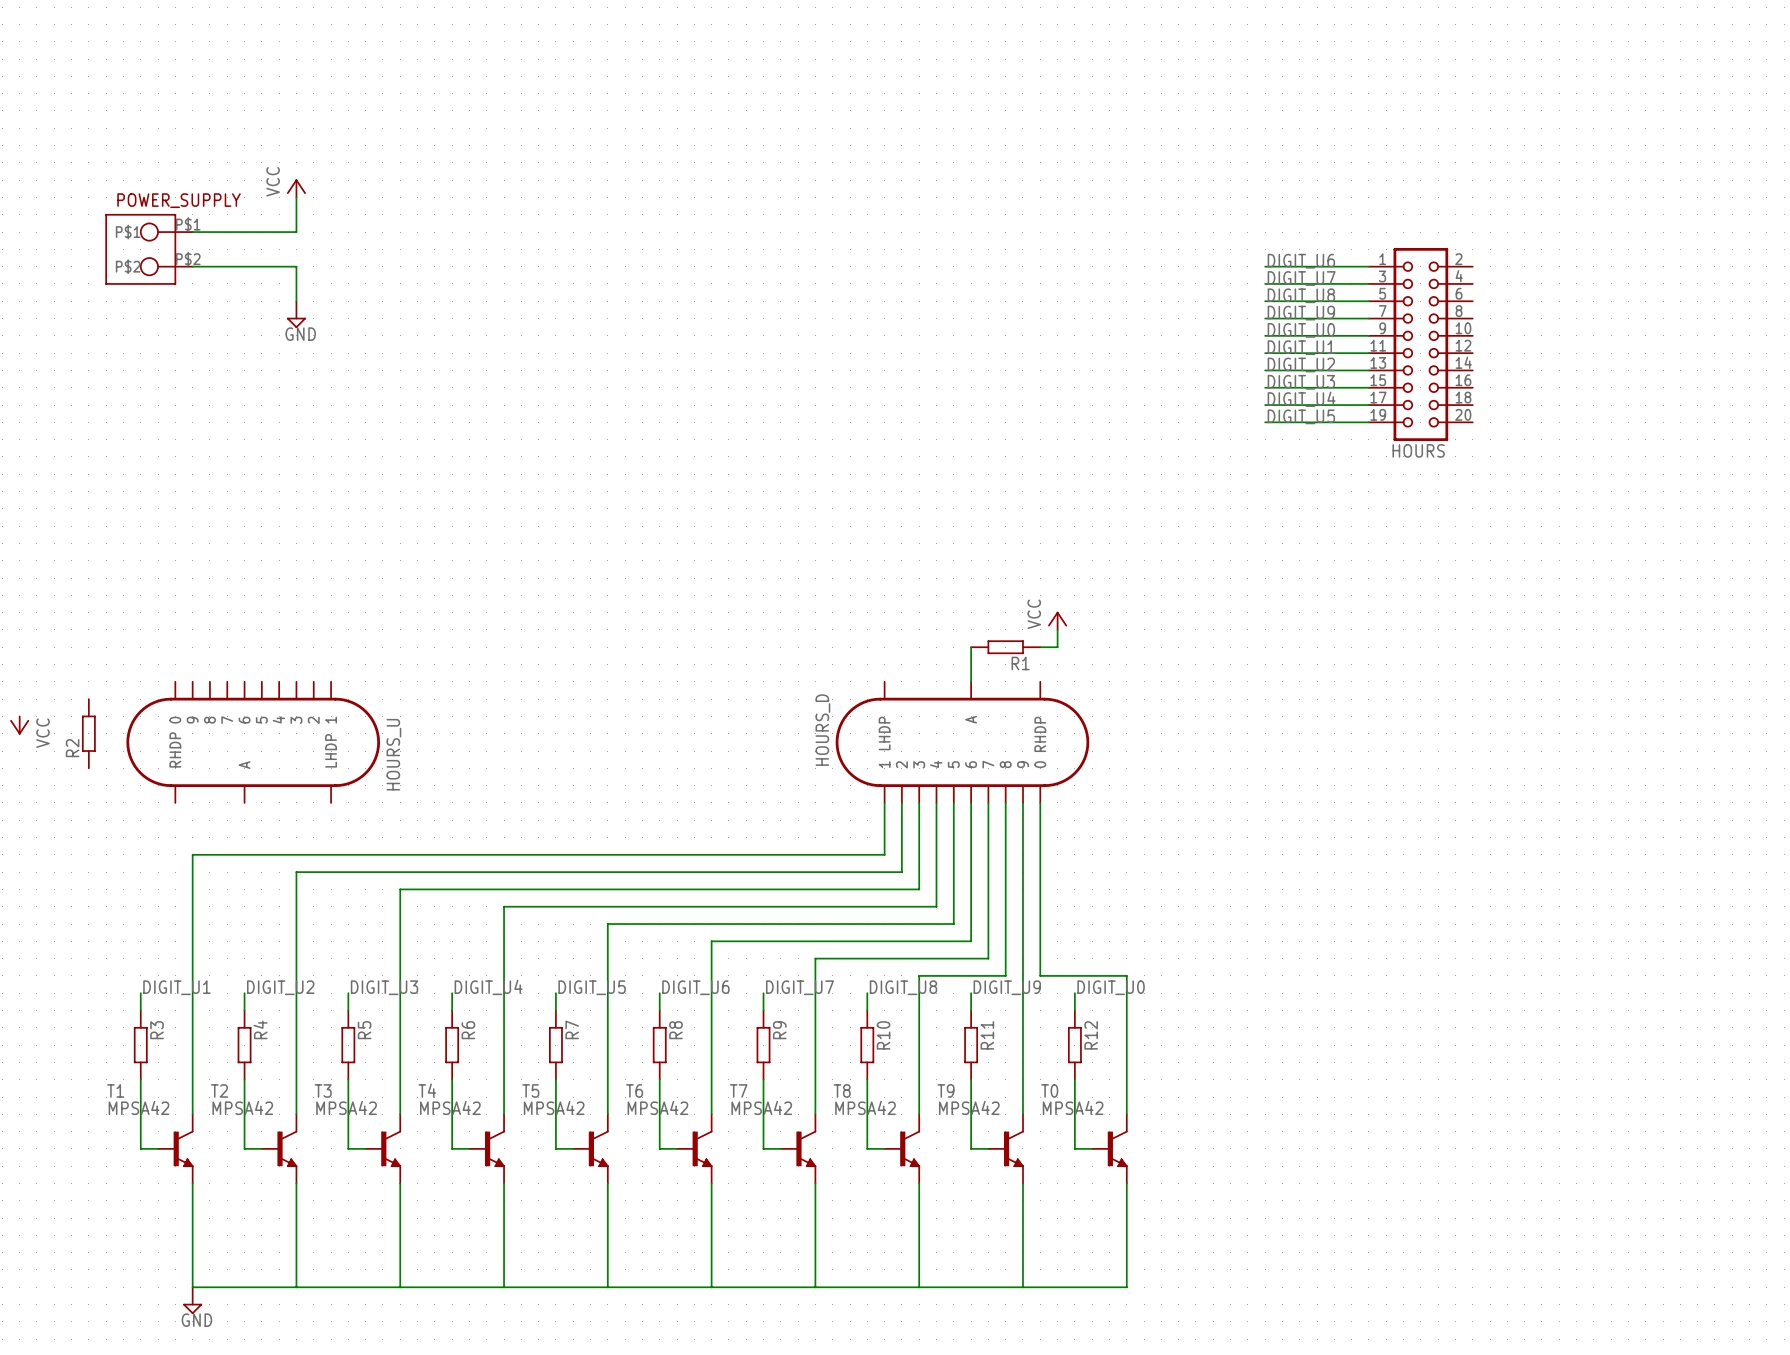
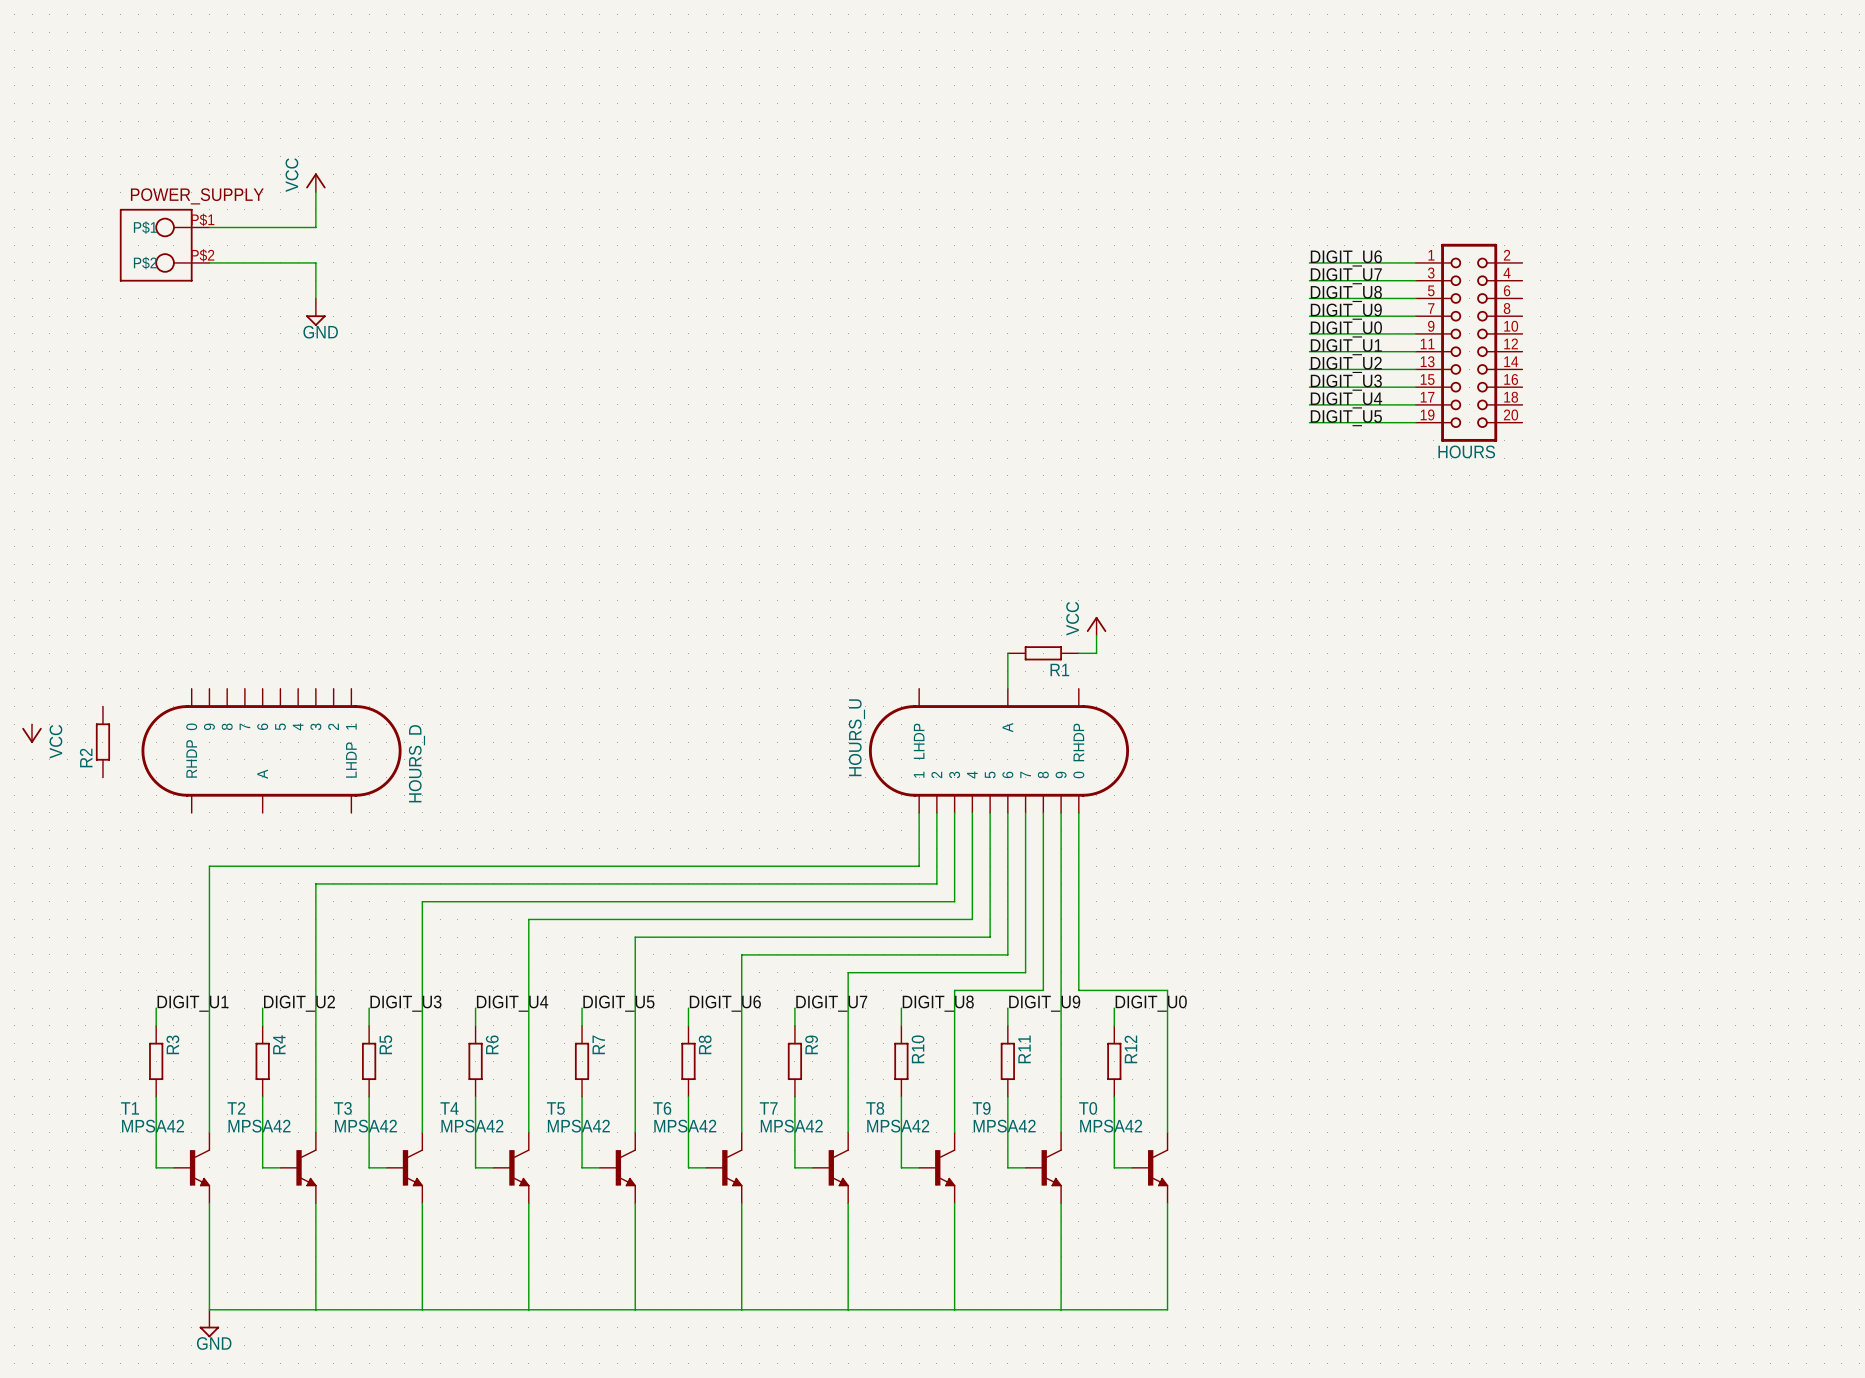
HOURS_D name: HOURS_D (822, 730) -> HOURS_U (856, 737)
HOURS_U name: HOURS_U (393, 754) -> HOURS_D (416, 763)

